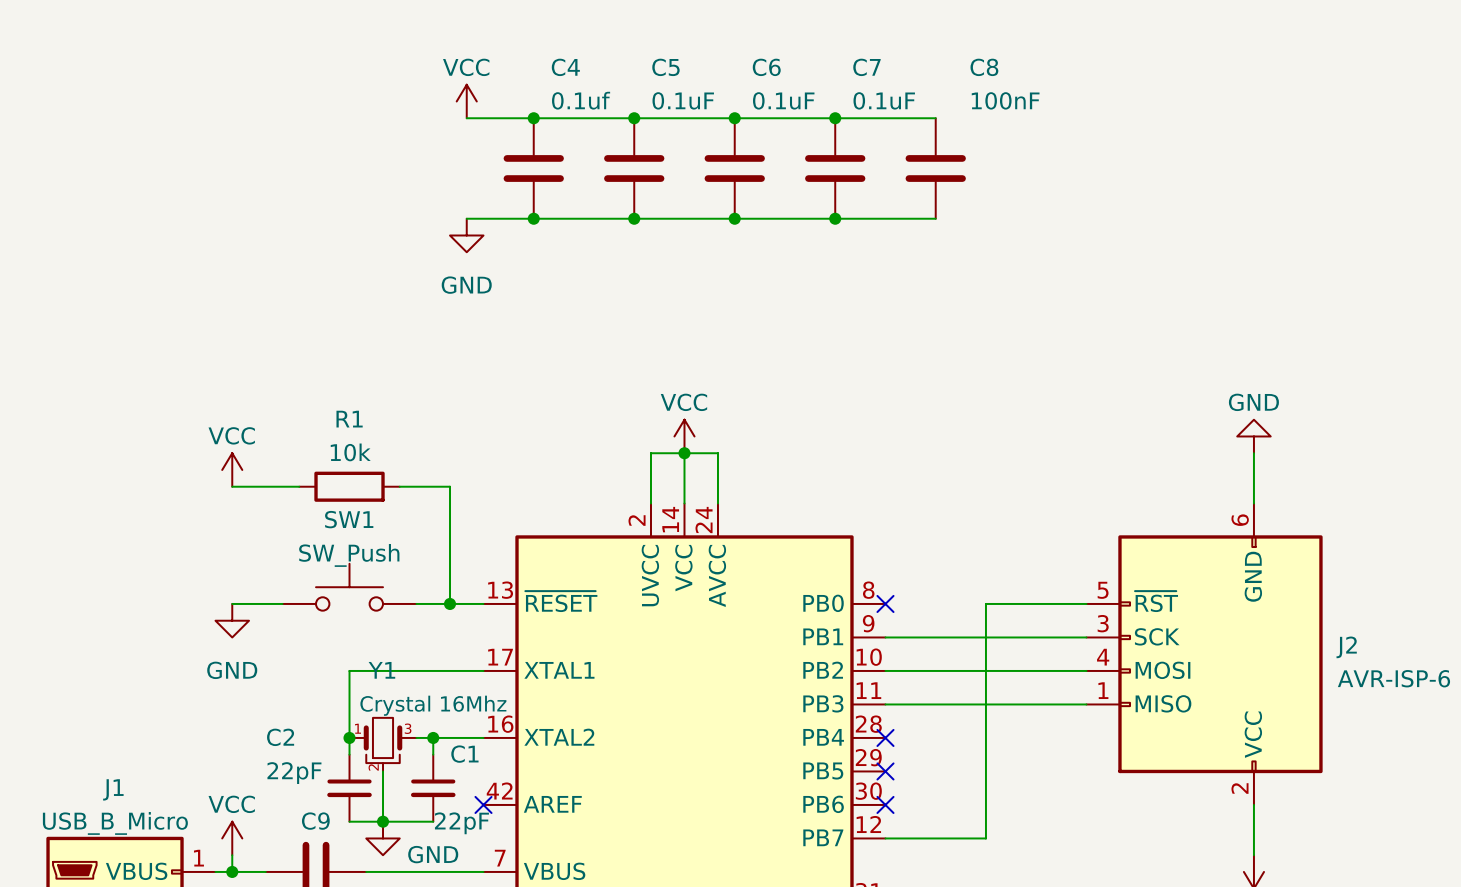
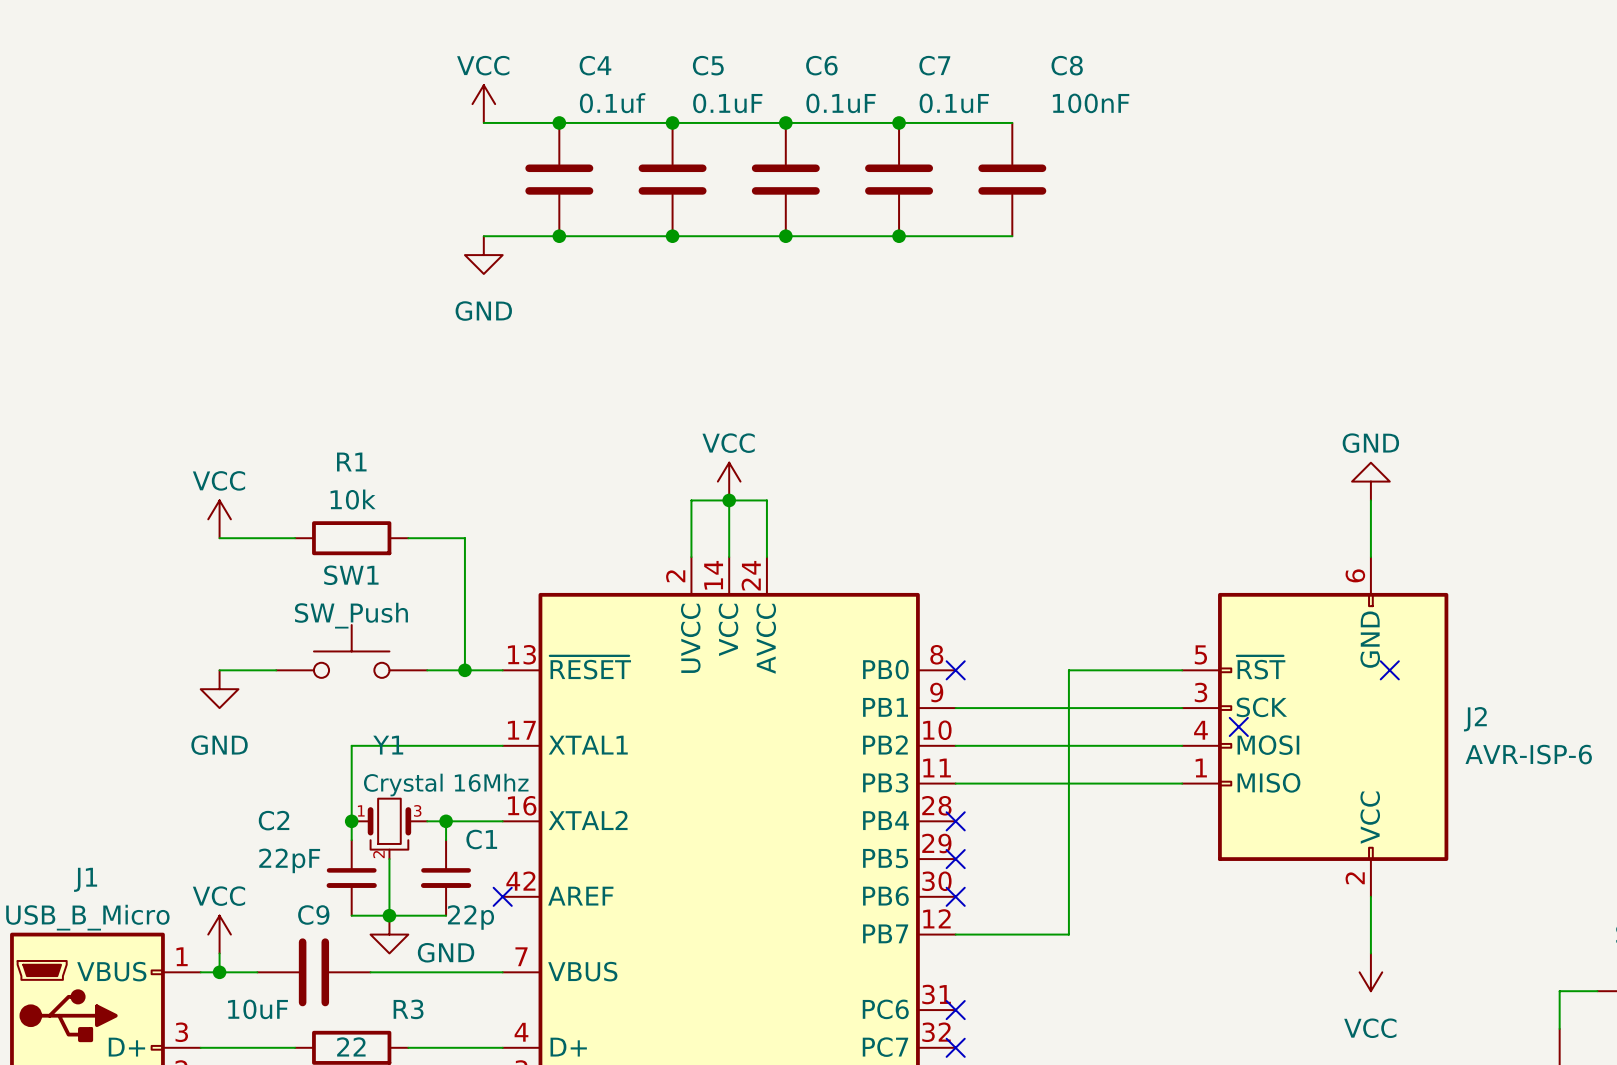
no-connect mark: none -> (1389, 670)
no-connect mark: none -> (1238, 726)
C1 value: 22pF (461, 823) -> 22p (471, 917)

